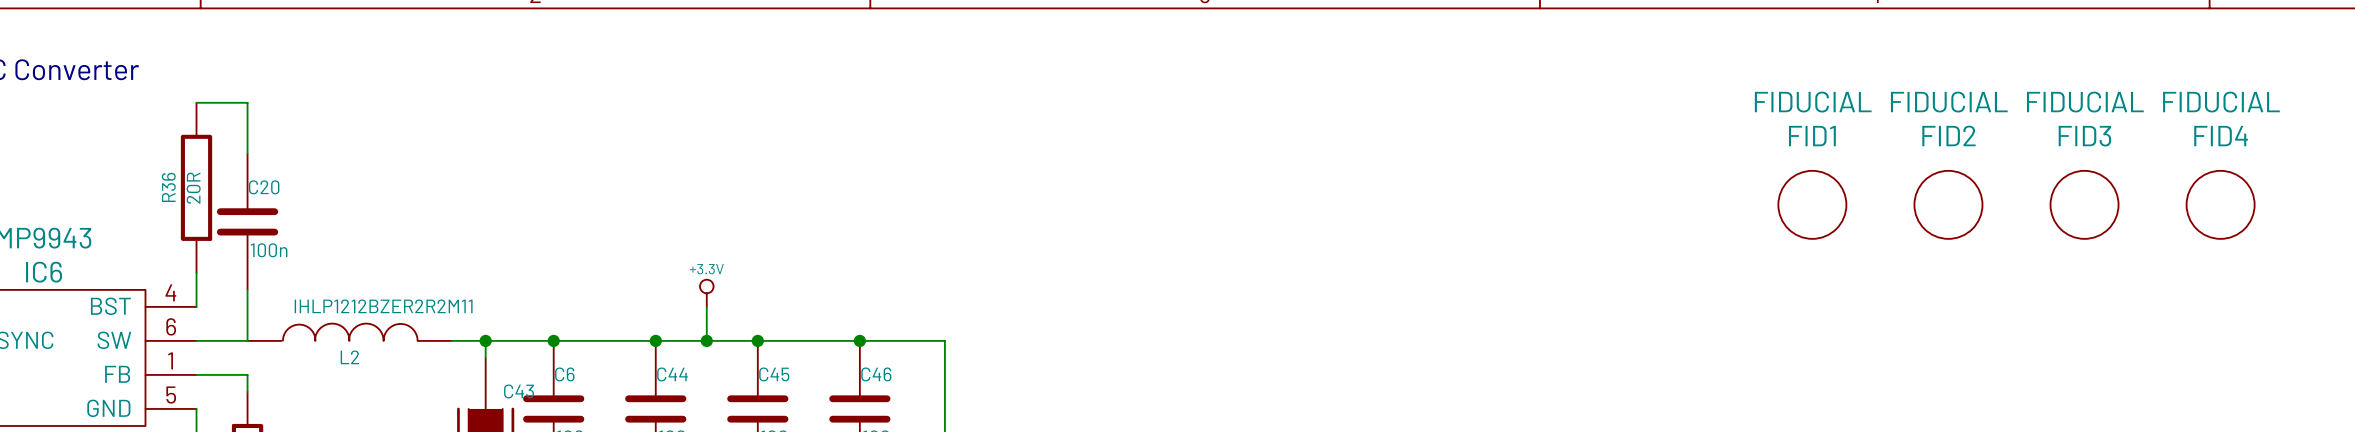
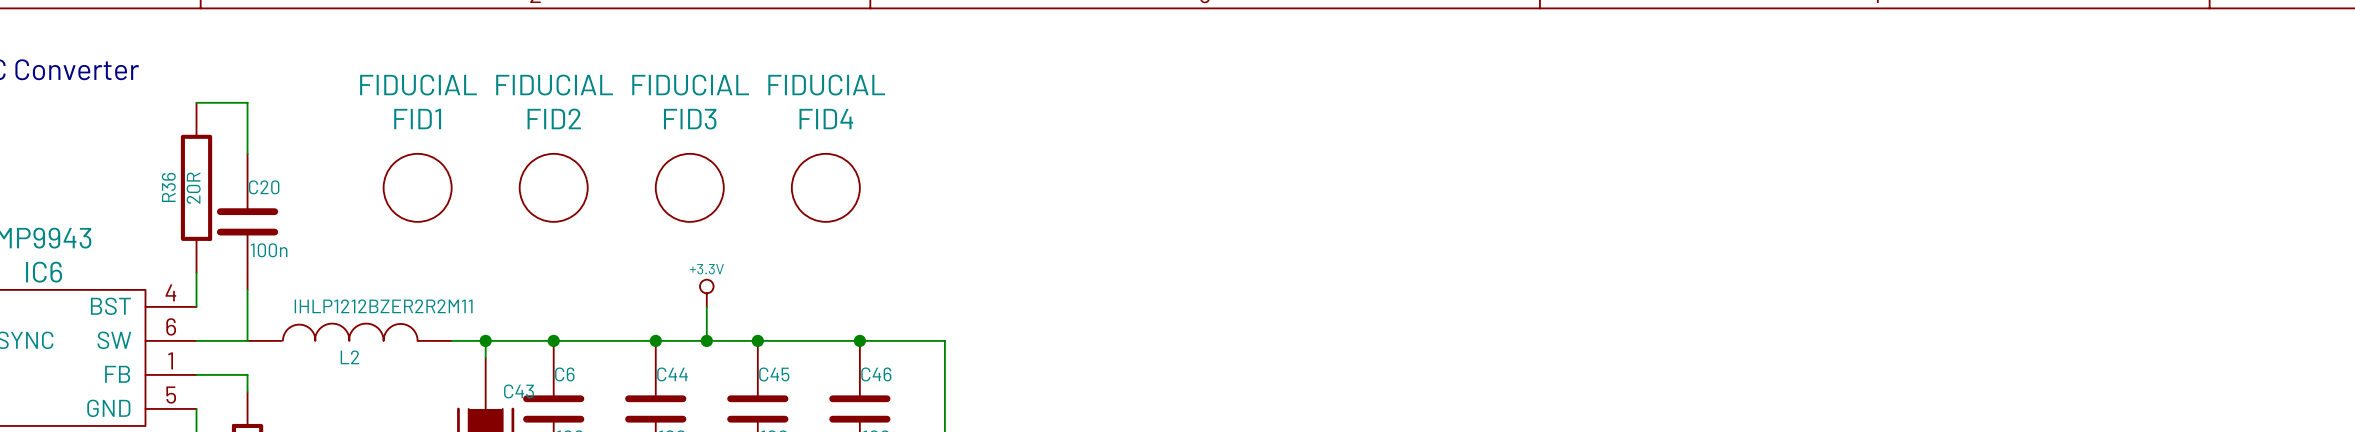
FID1 position: (1812, 204) -> (417, 187)
FID2 position: (1948, 204) -> (553, 187)
FID3 position: (2084, 204) -> (689, 187)
FID4 position: (2220, 204) -> (825, 187)

